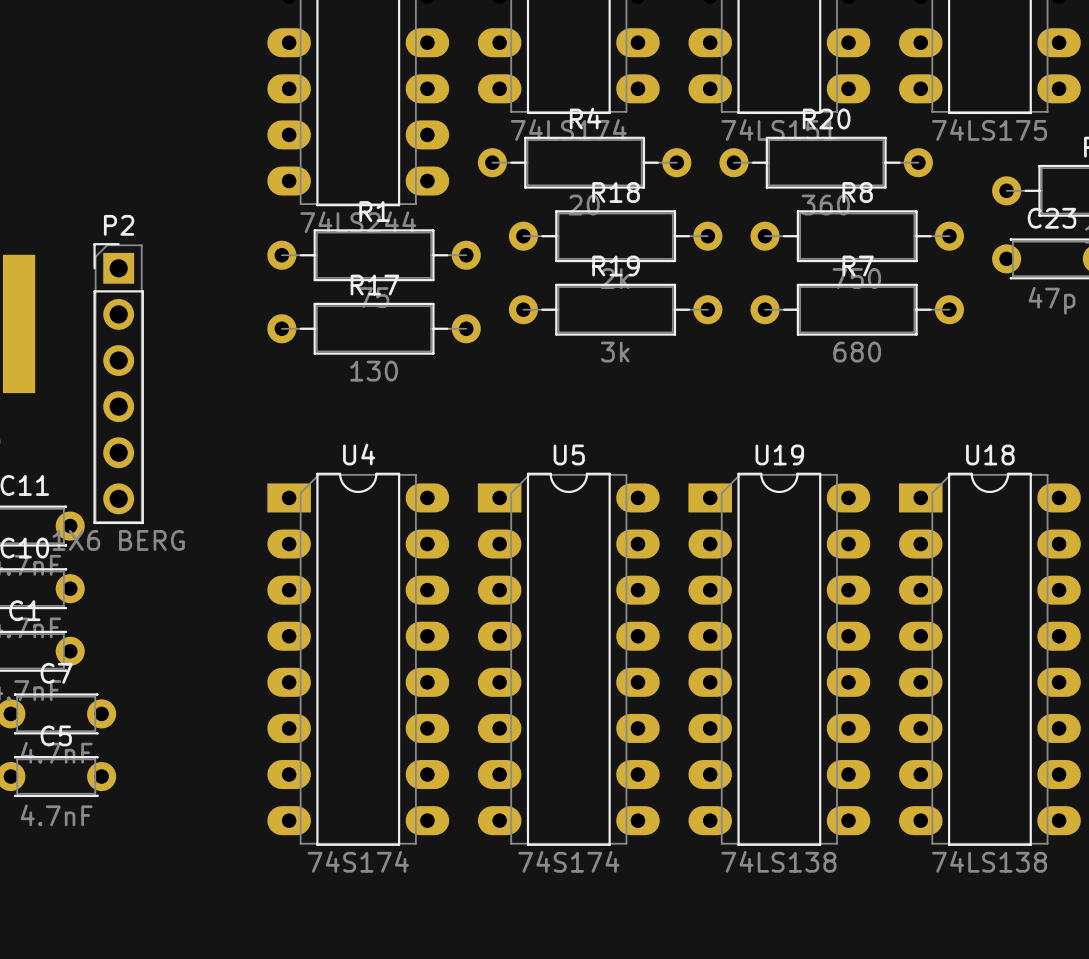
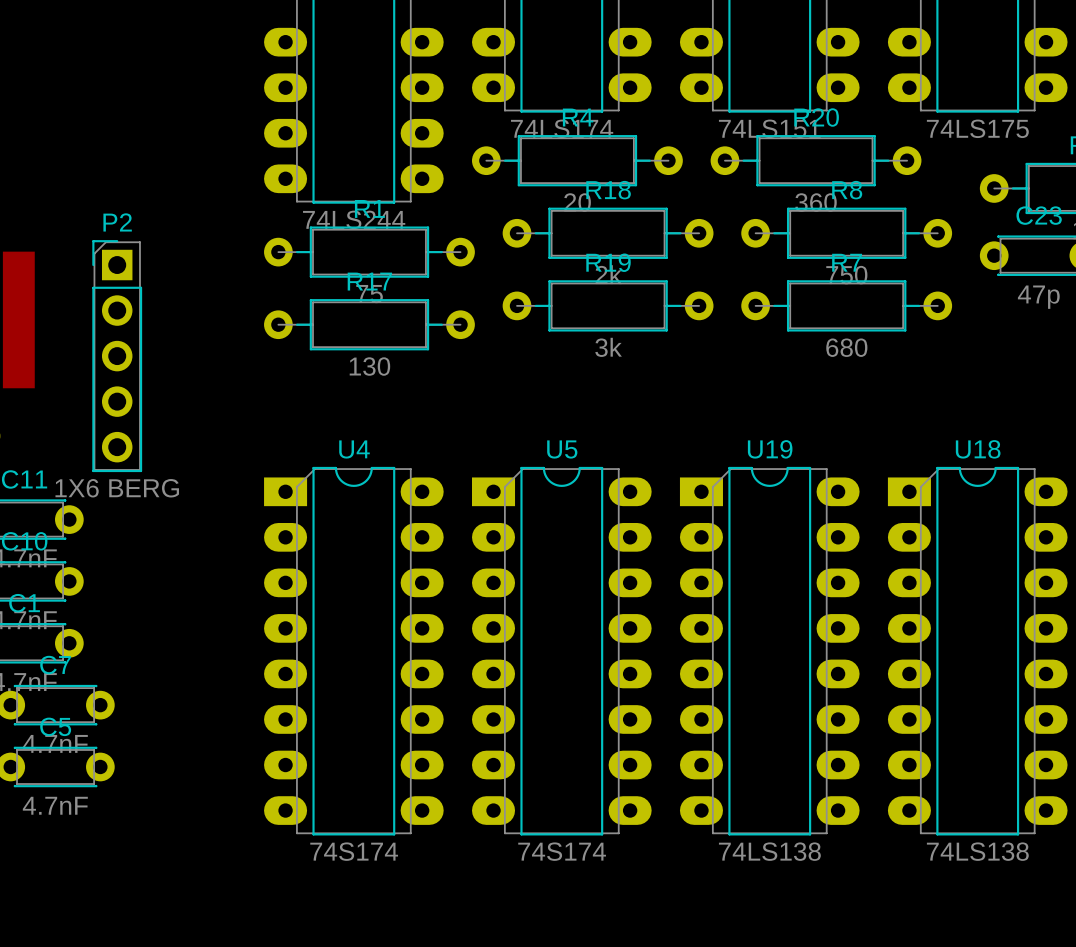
P2 footprint: [93, 243, 144, 525] -> [92, 240, 143, 473]

